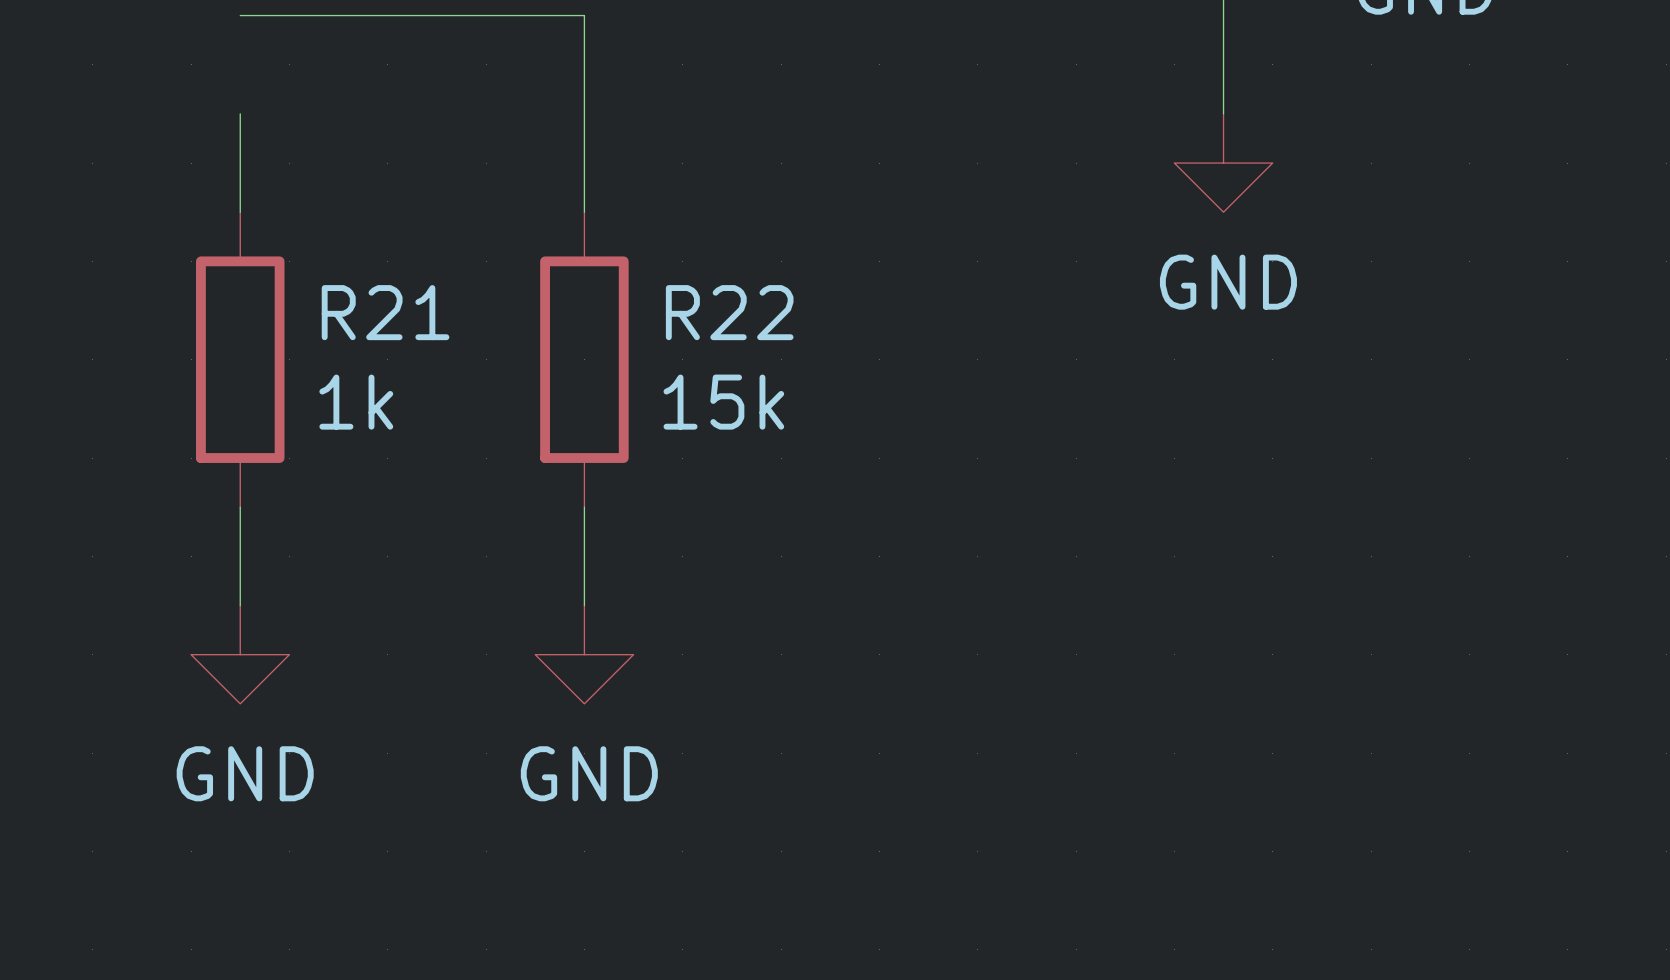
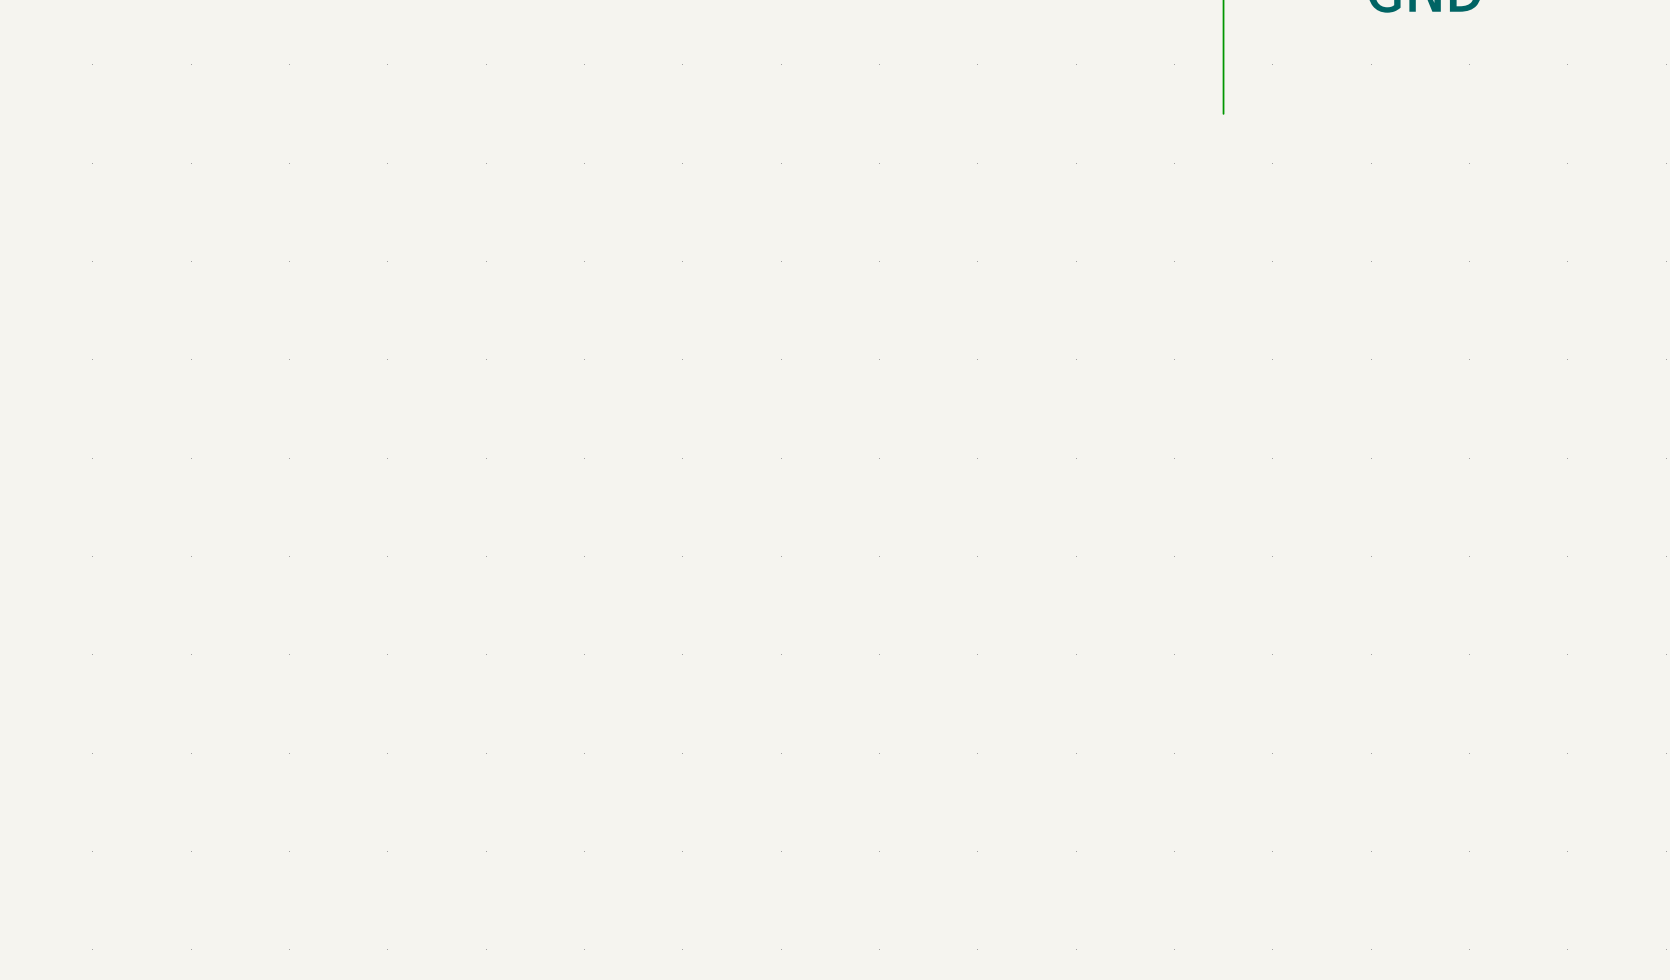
wire: (240, 15) (584, 15) (584, 212) -> none
wire: (240, 113) (240, 212) -> none
power symbol: GND (1223, 163) -> none
R21: 1k (240, 359) -> none
R22: 15k (584, 359) -> none
wire: (240, 507) (240, 605) -> none
wire: (584, 507) (584, 605) -> none
power symbol: GND (240, 654) -> none
power symbol: GND (584, 654) -> none

